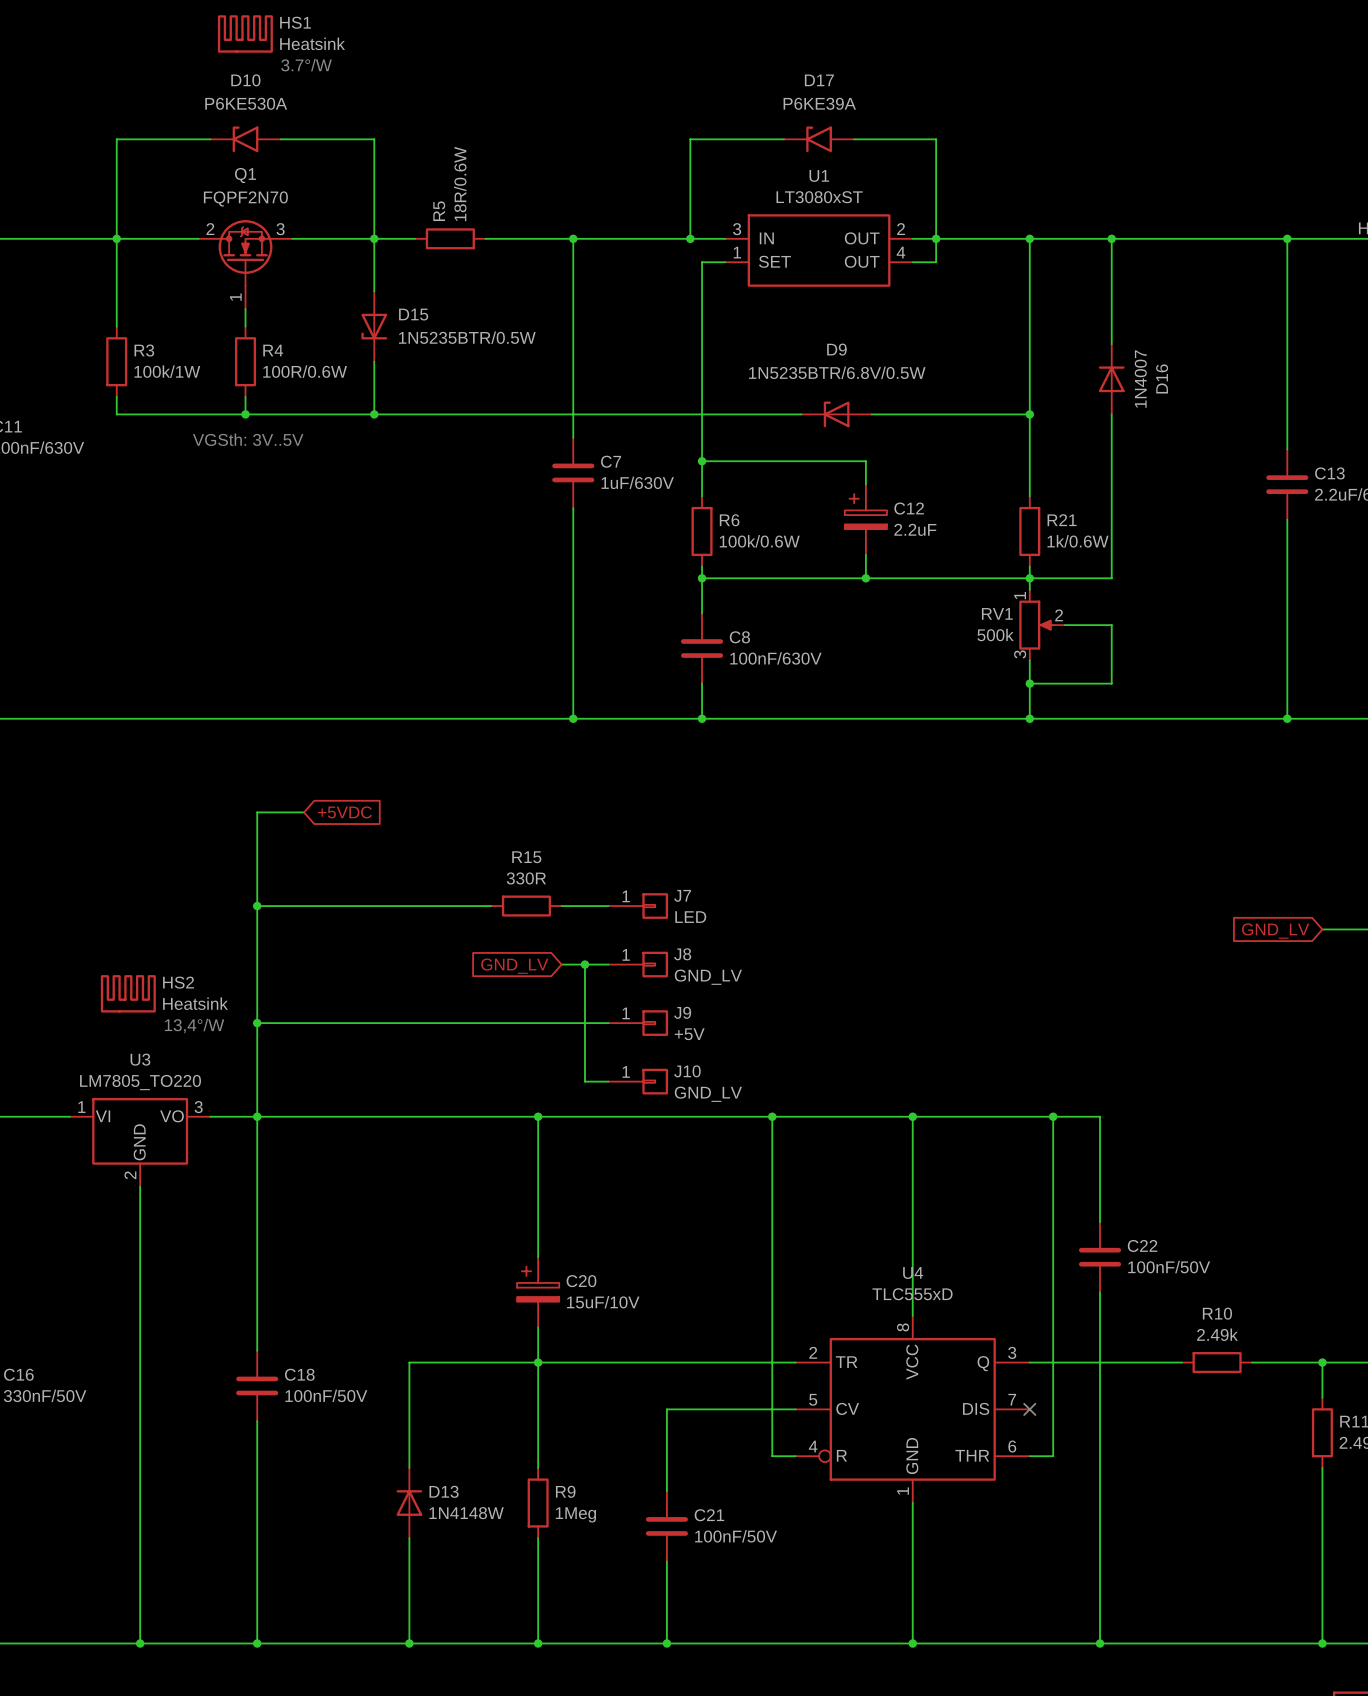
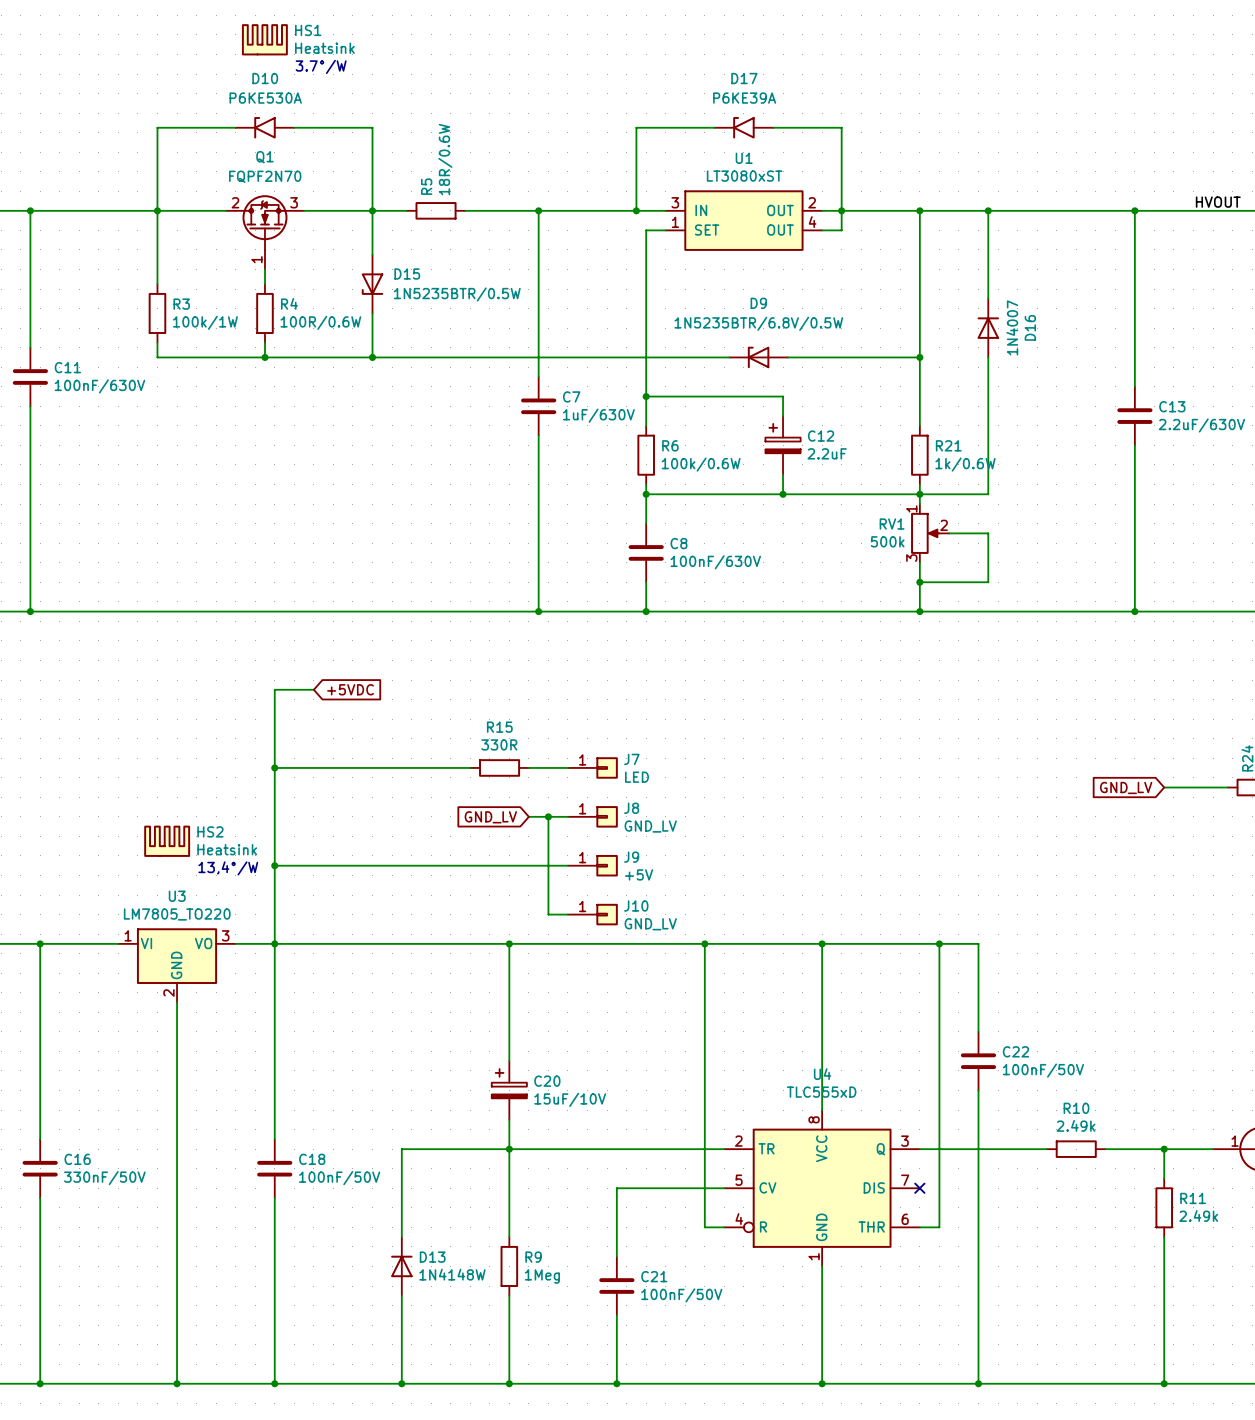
text: VGSth: 3V..5V (248, 439) -> none

